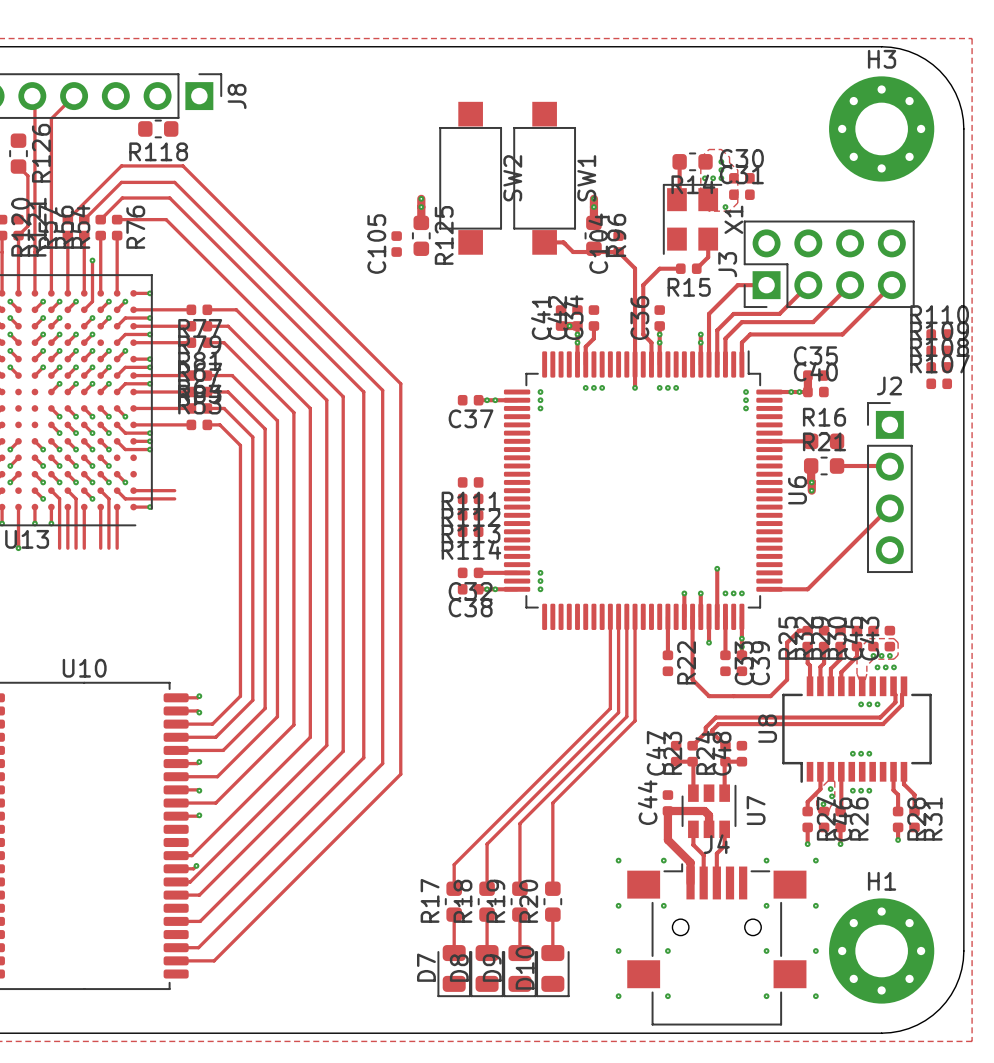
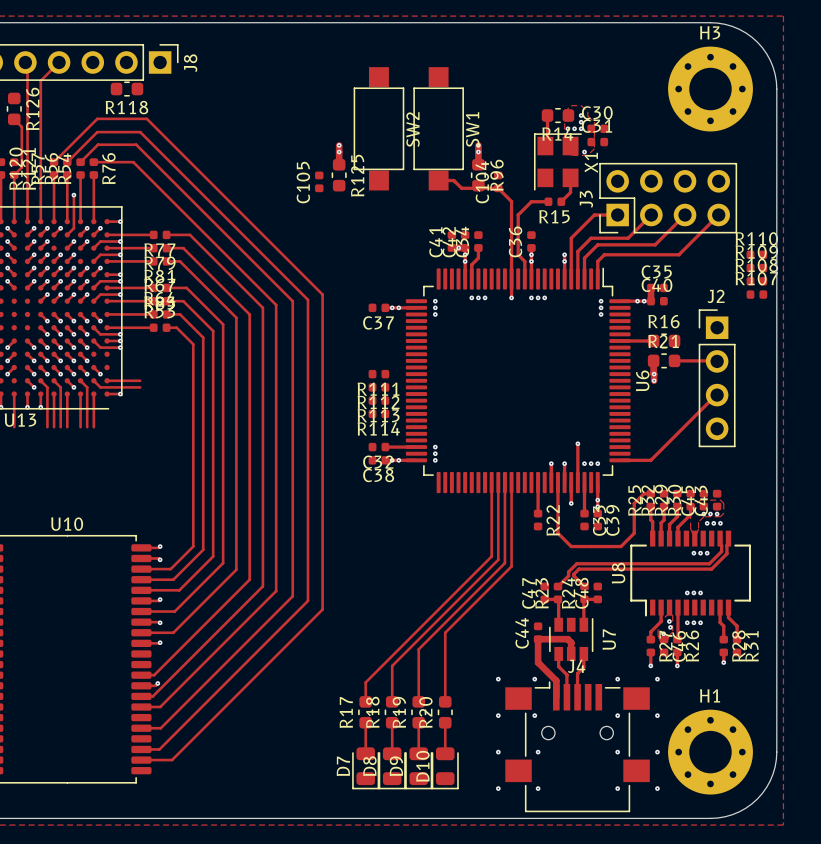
via: (18, 548) -> none

